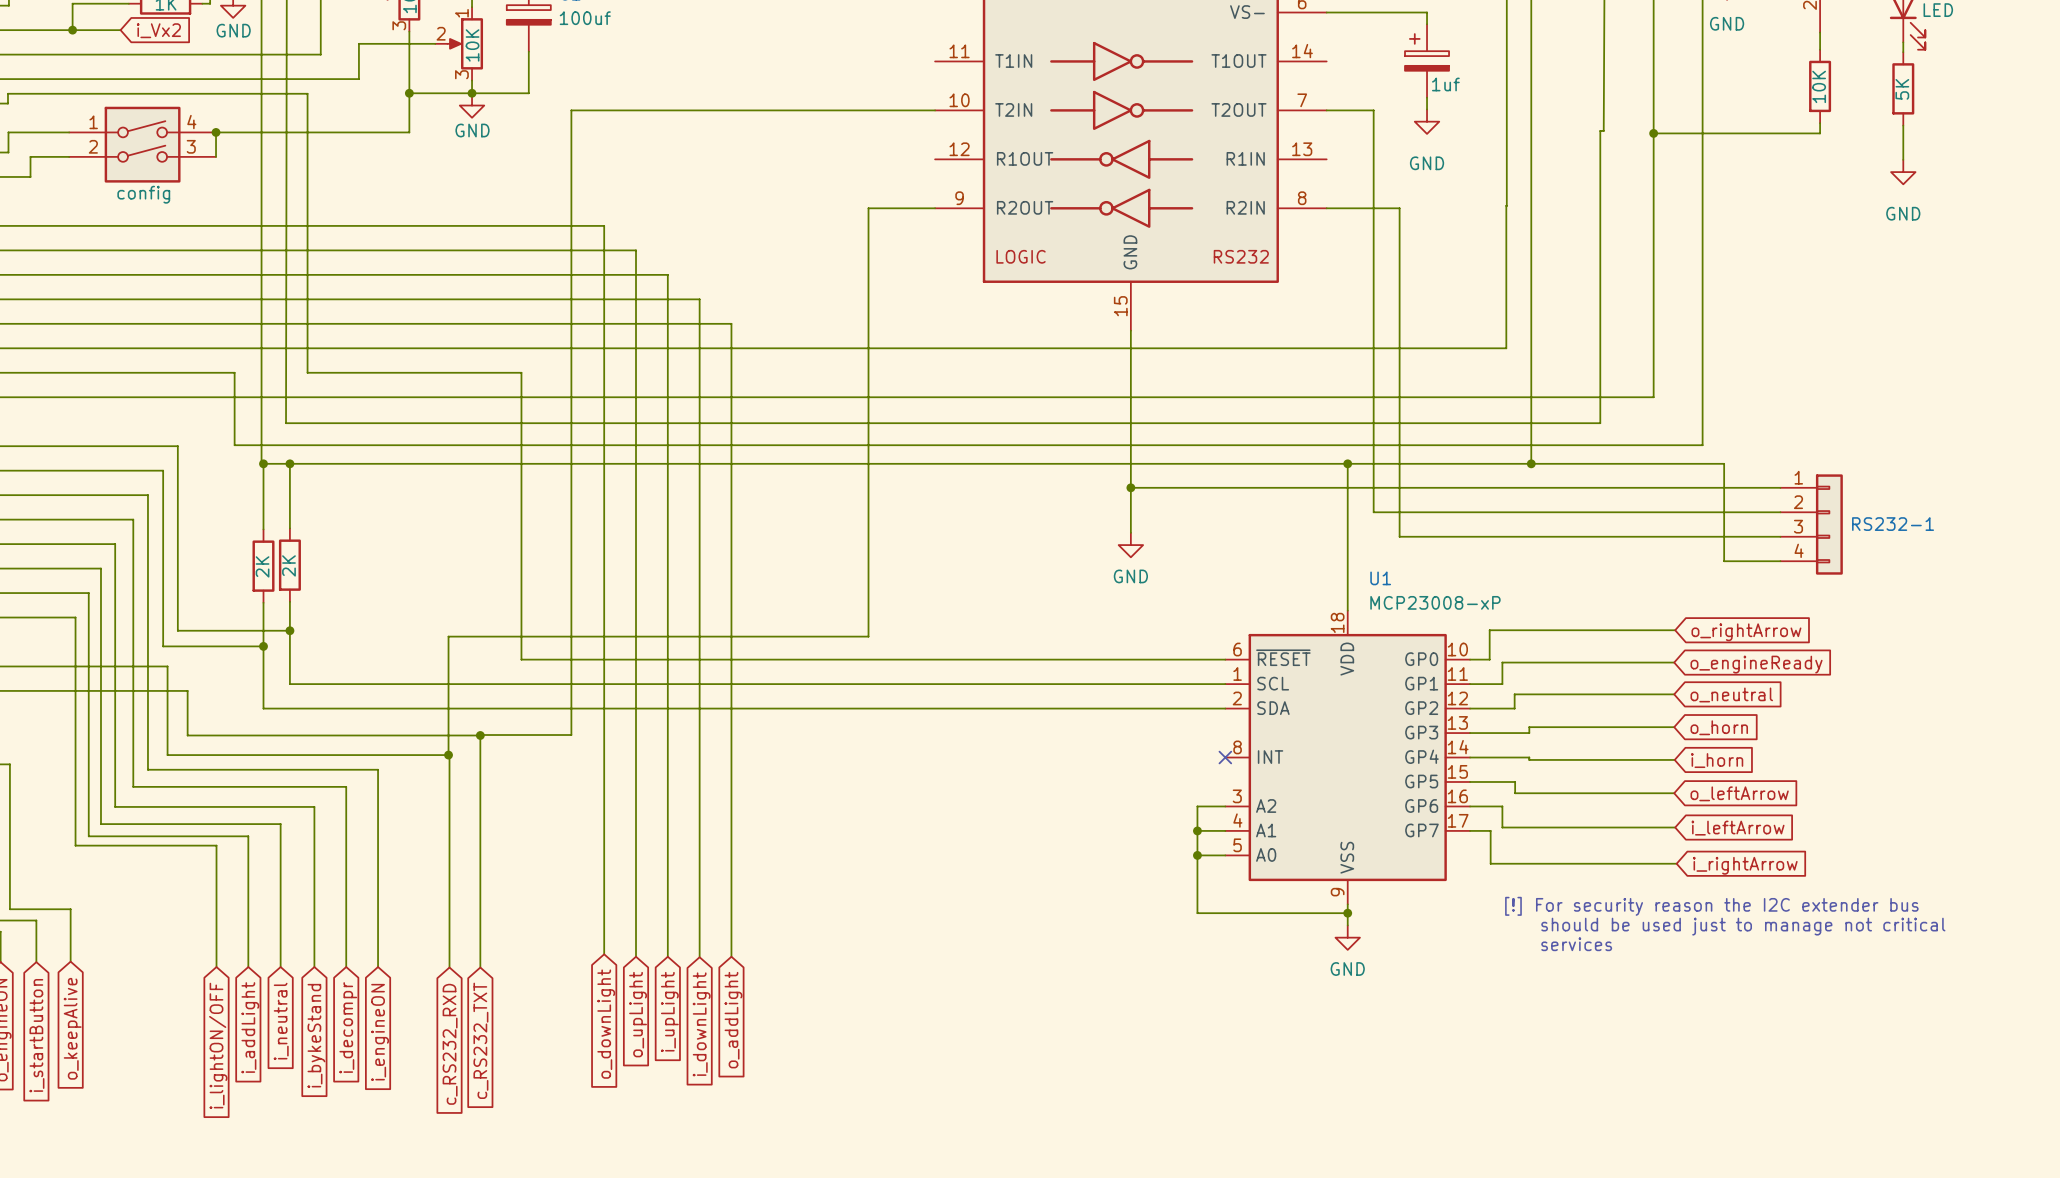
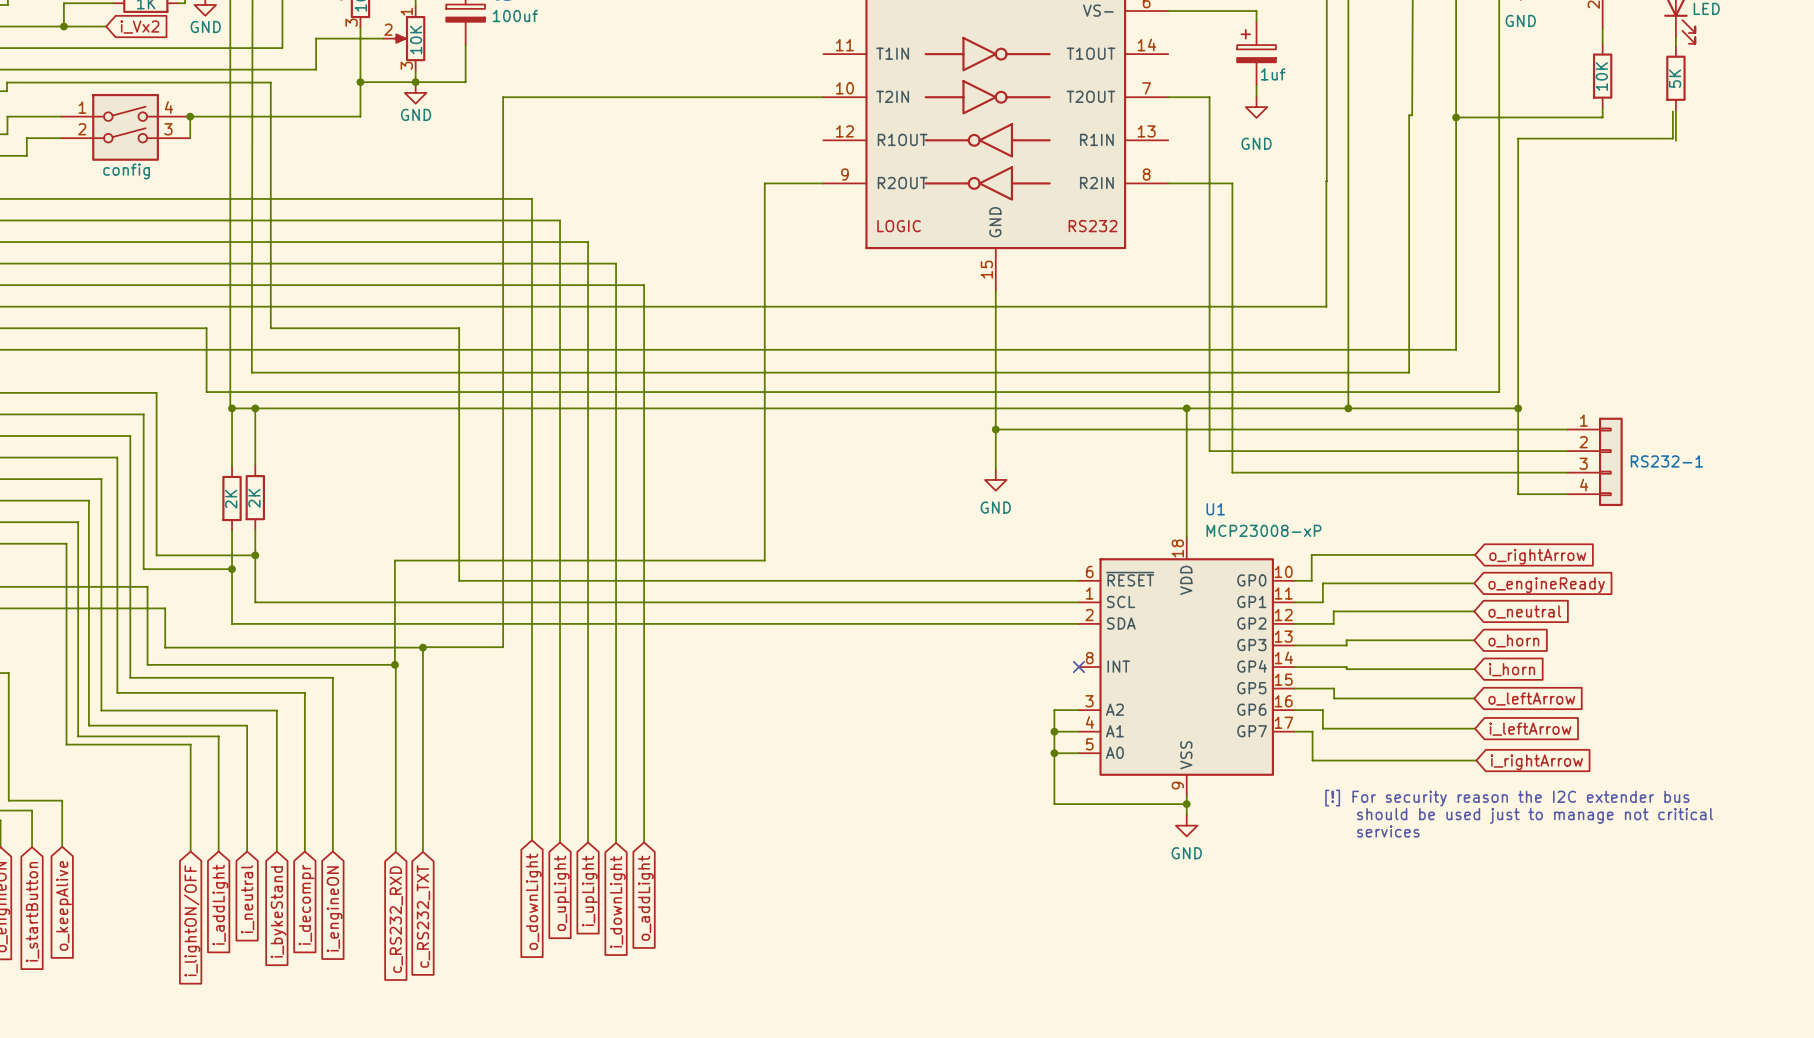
wire: none -> (1672, 111) (1672, 138) (1518, 138) (1518, 408)
power symbol: GND (1903, 172) -> none
junction: none -> (1518, 408)

